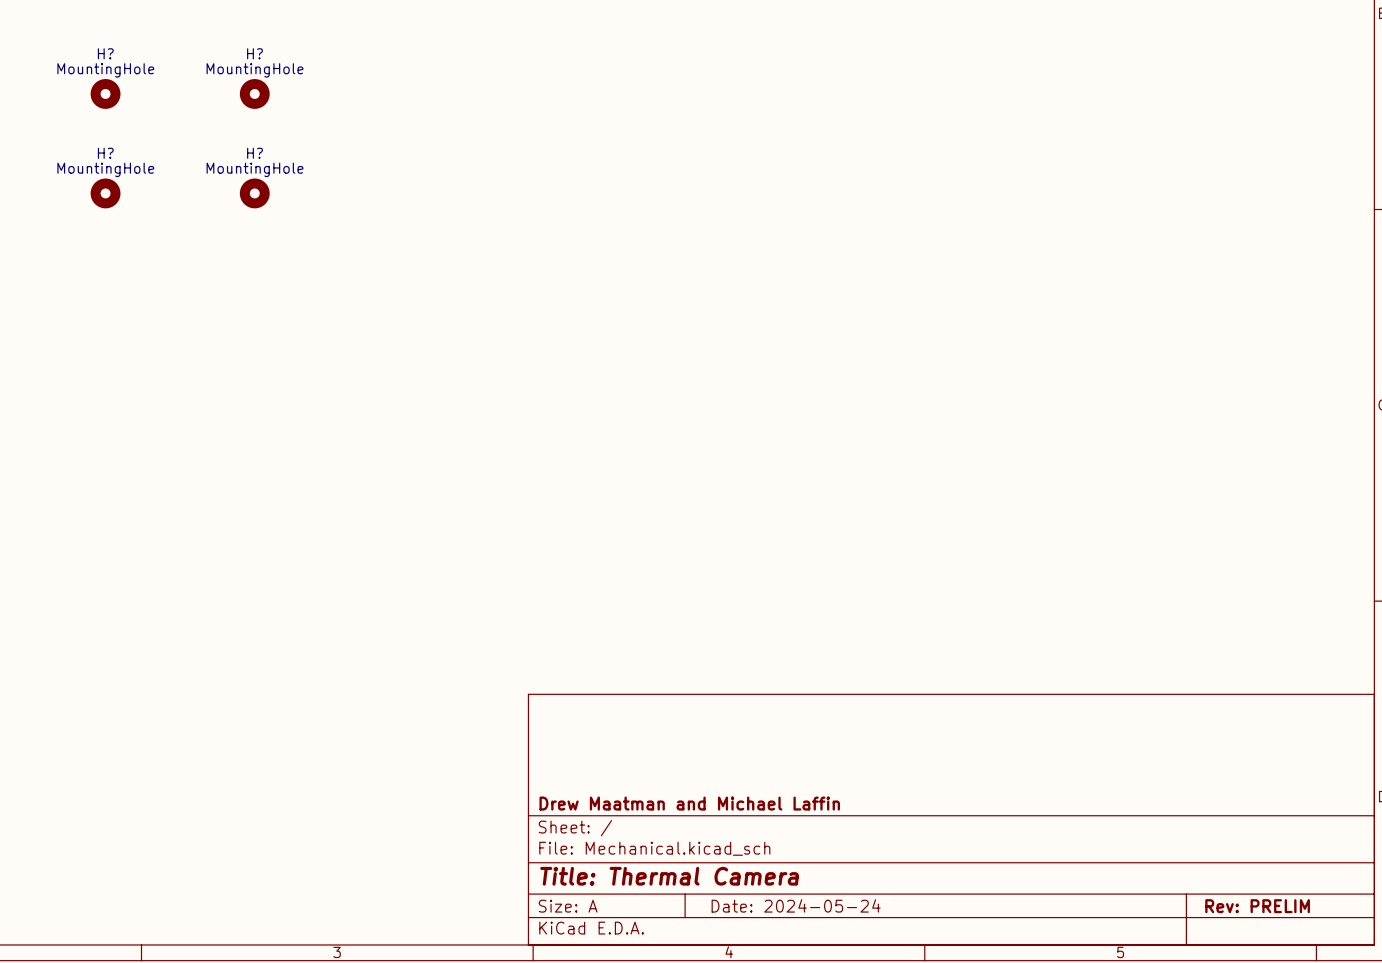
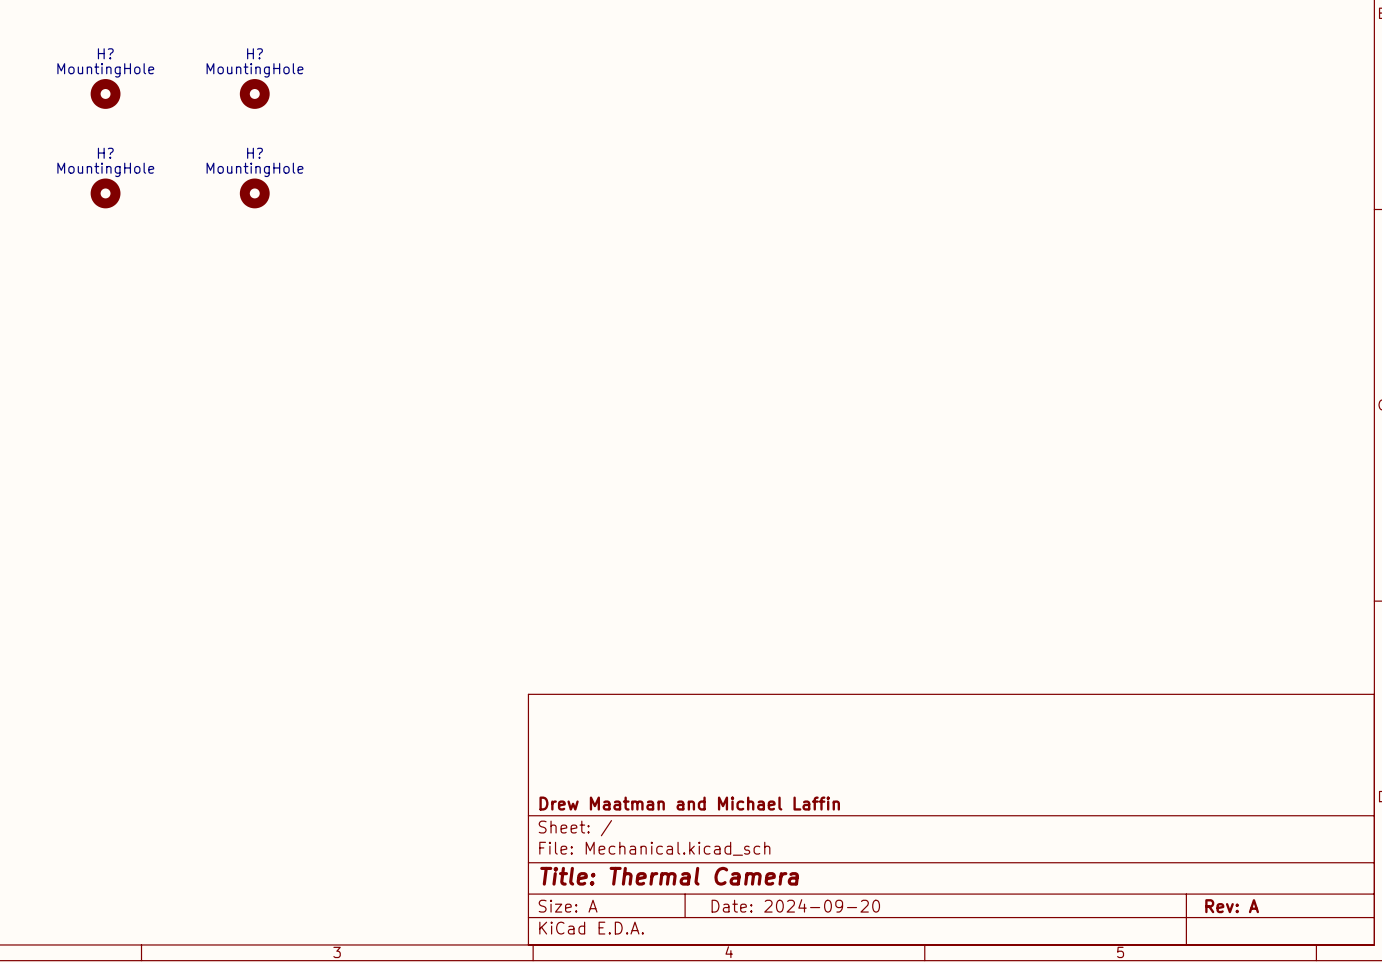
title block: Date: 2024-05-24 (796, 905) -> Date: 2024-09-20 (795, 905)
title block: Rev: PRELIM (1257, 906) -> Rev: A (1232, 906)

